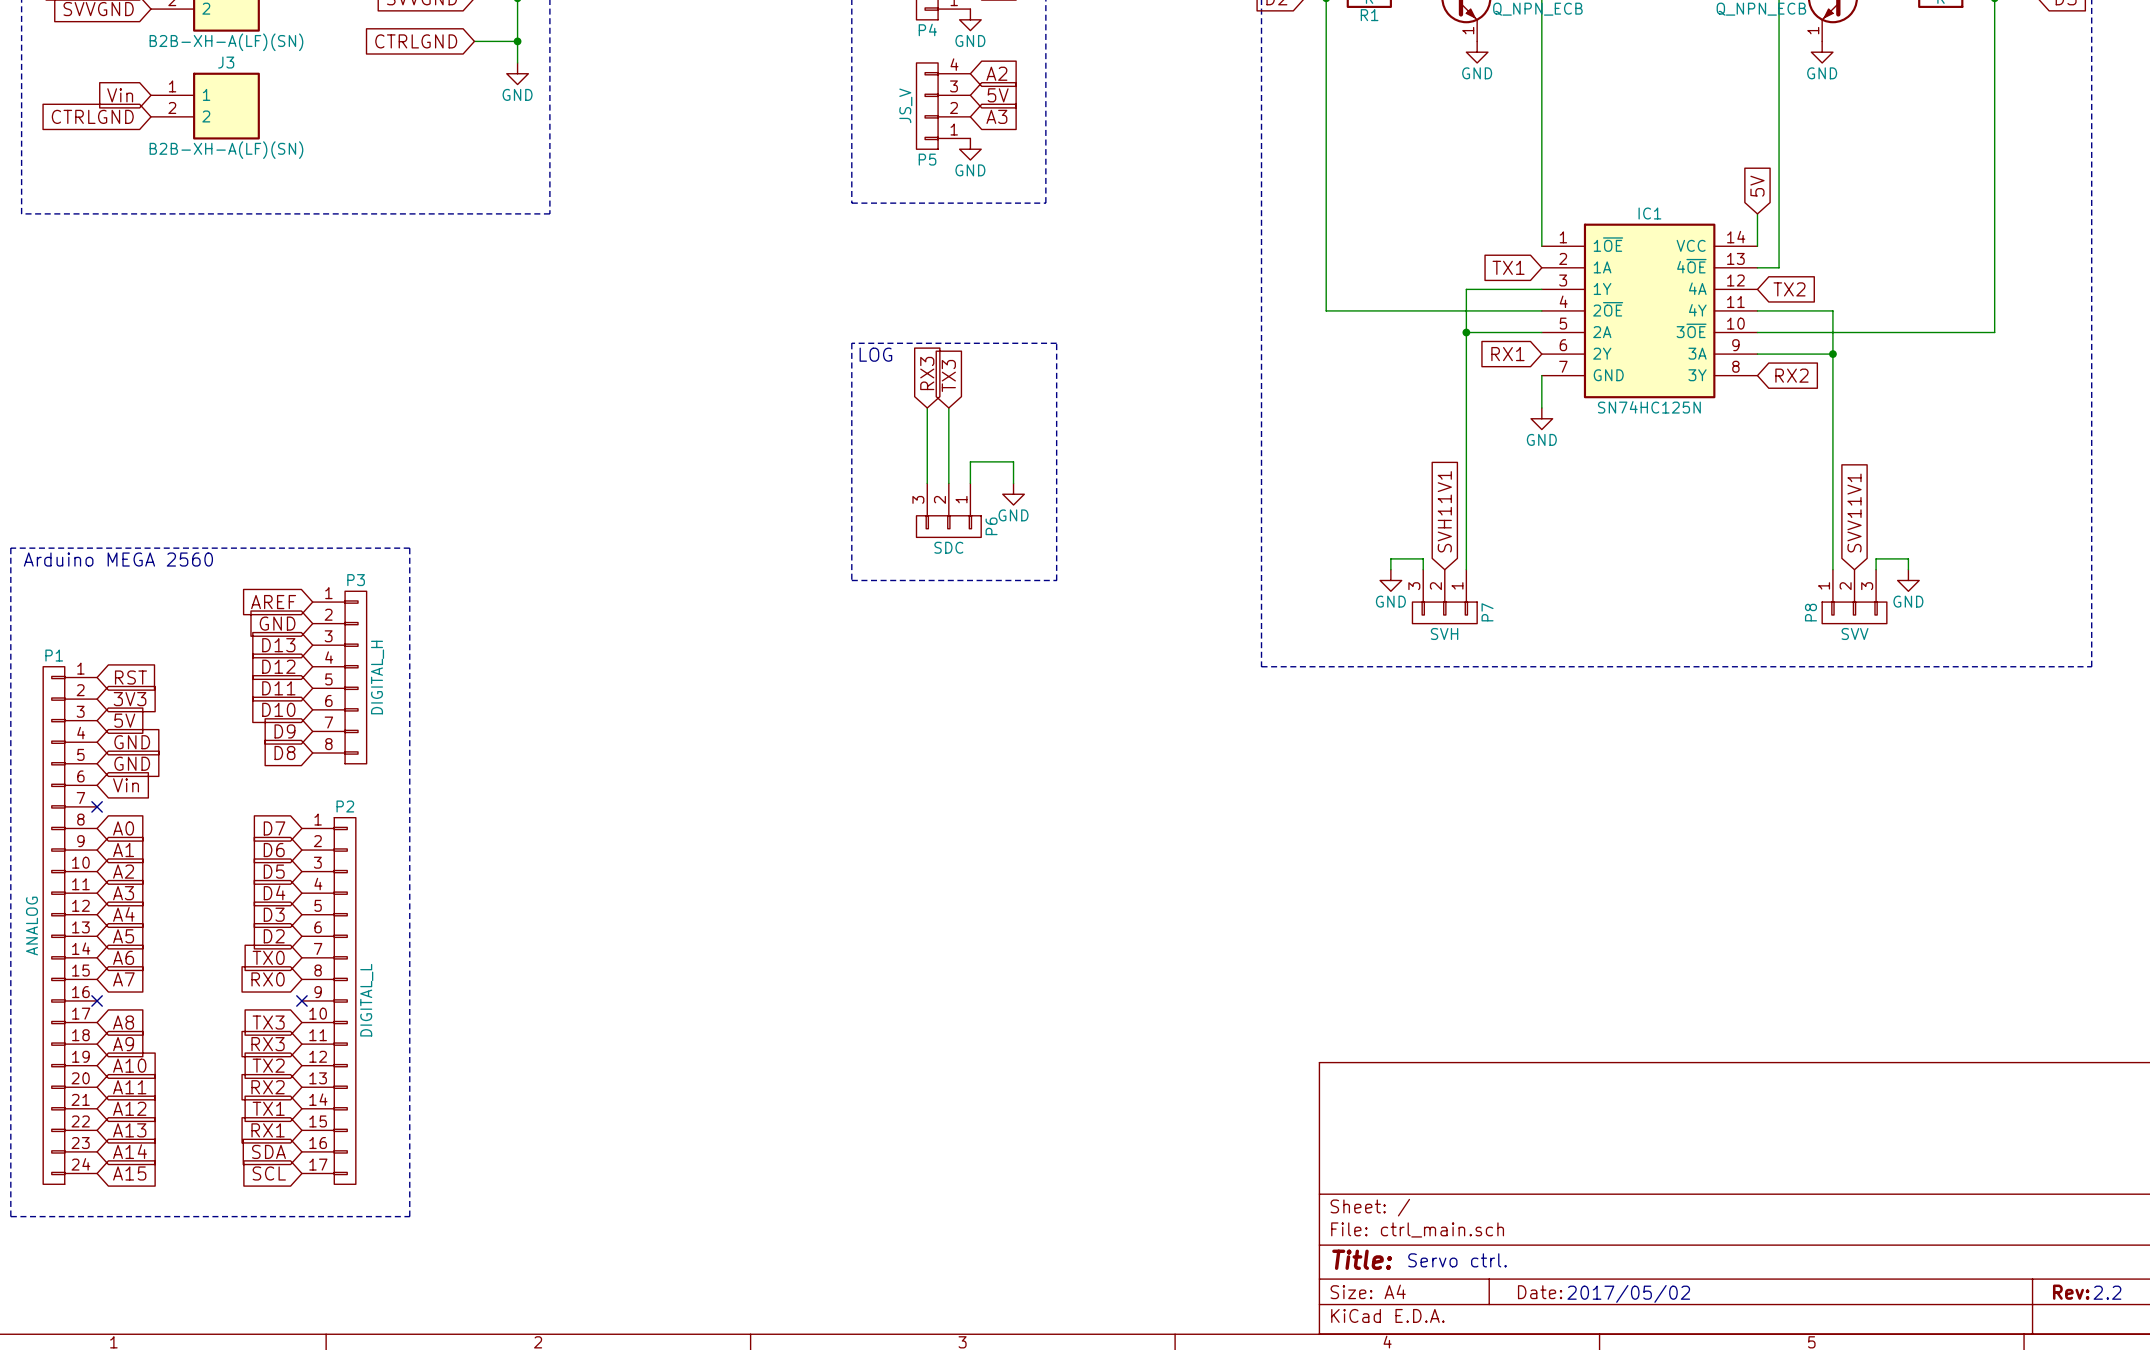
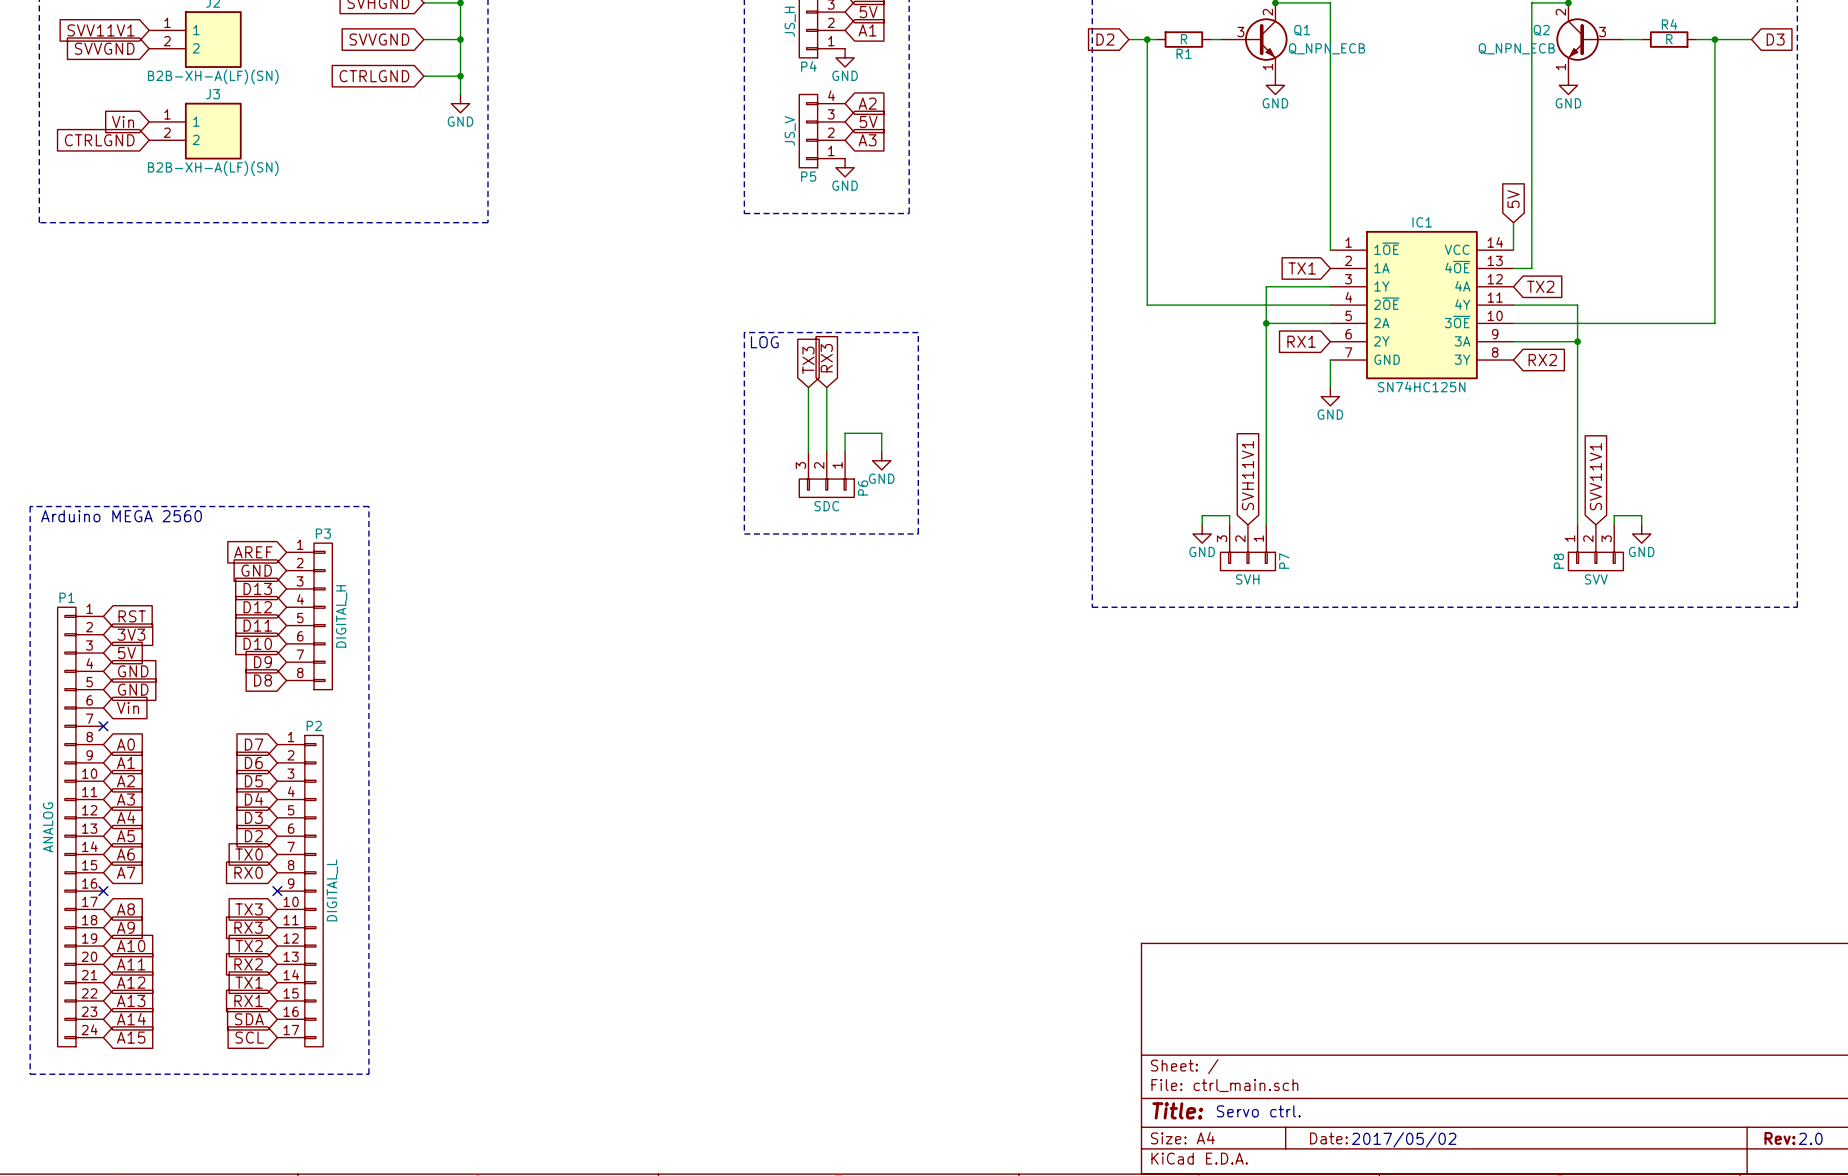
global label: RX3 (927, 373) -> TX3 (808, 360)
global label: TX3 (948, 375) -> RX3 (826, 358)
text: 2.2 (2107, 1292) -> 2.0 (1810, 1138)

